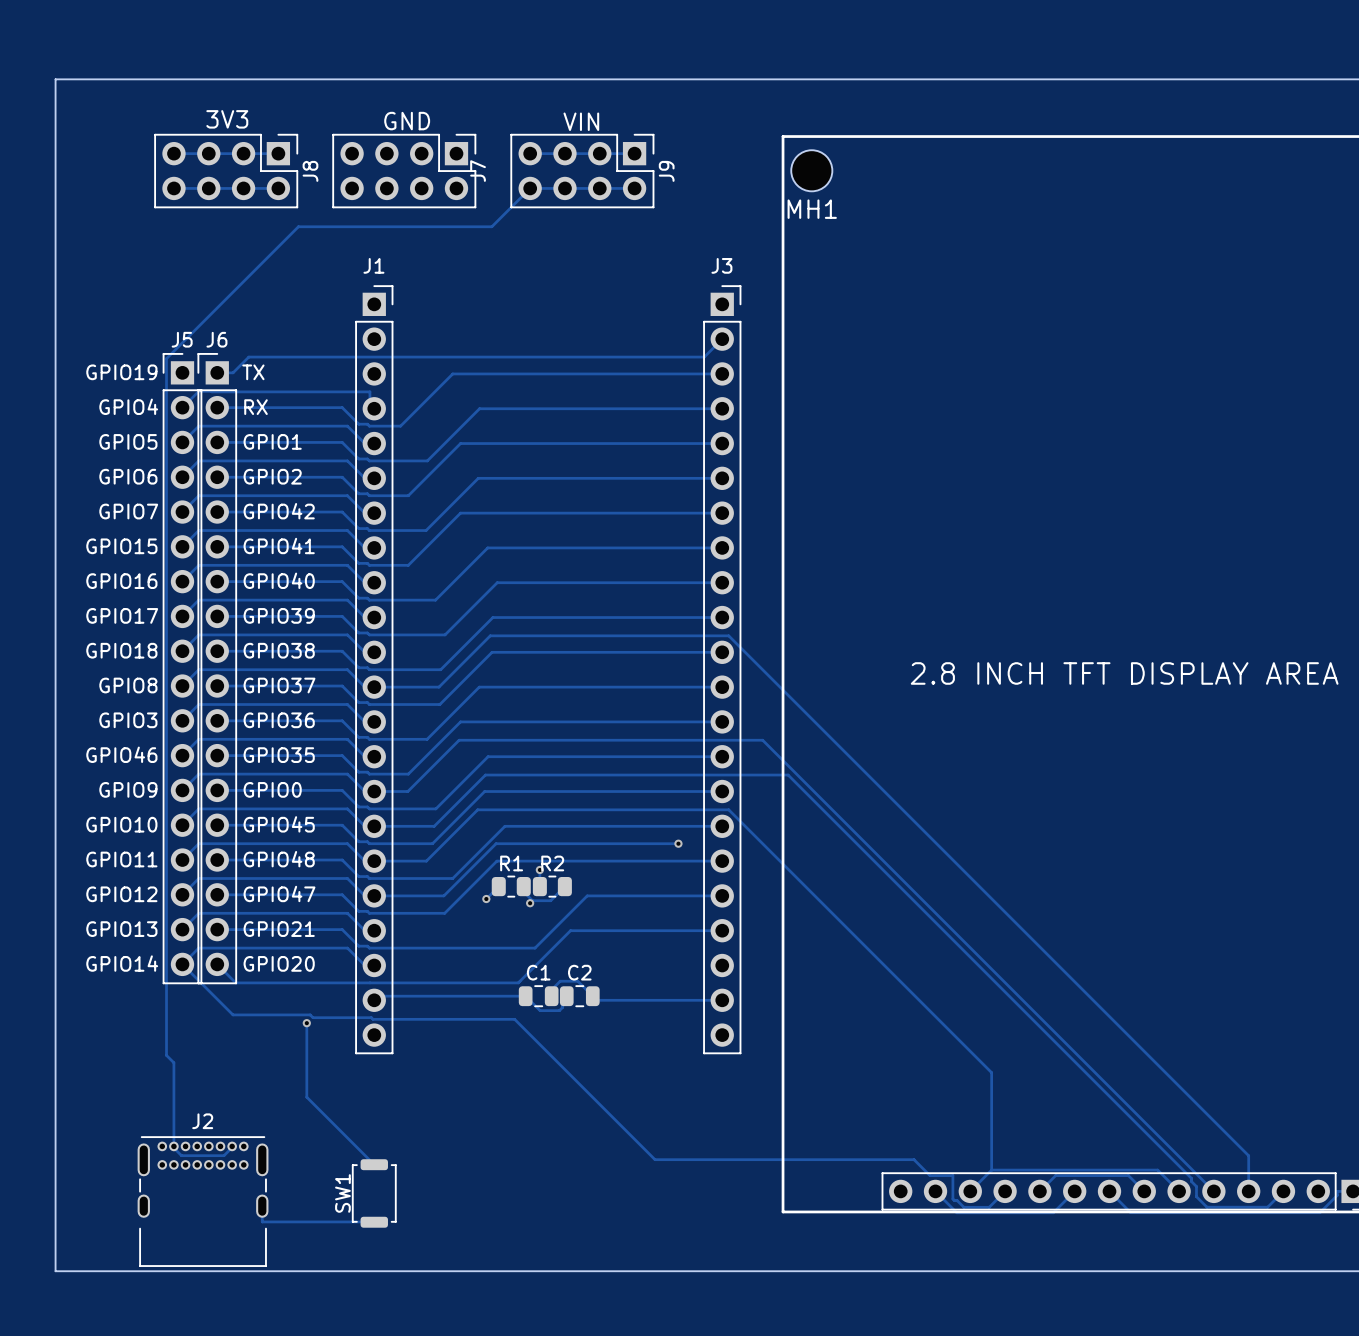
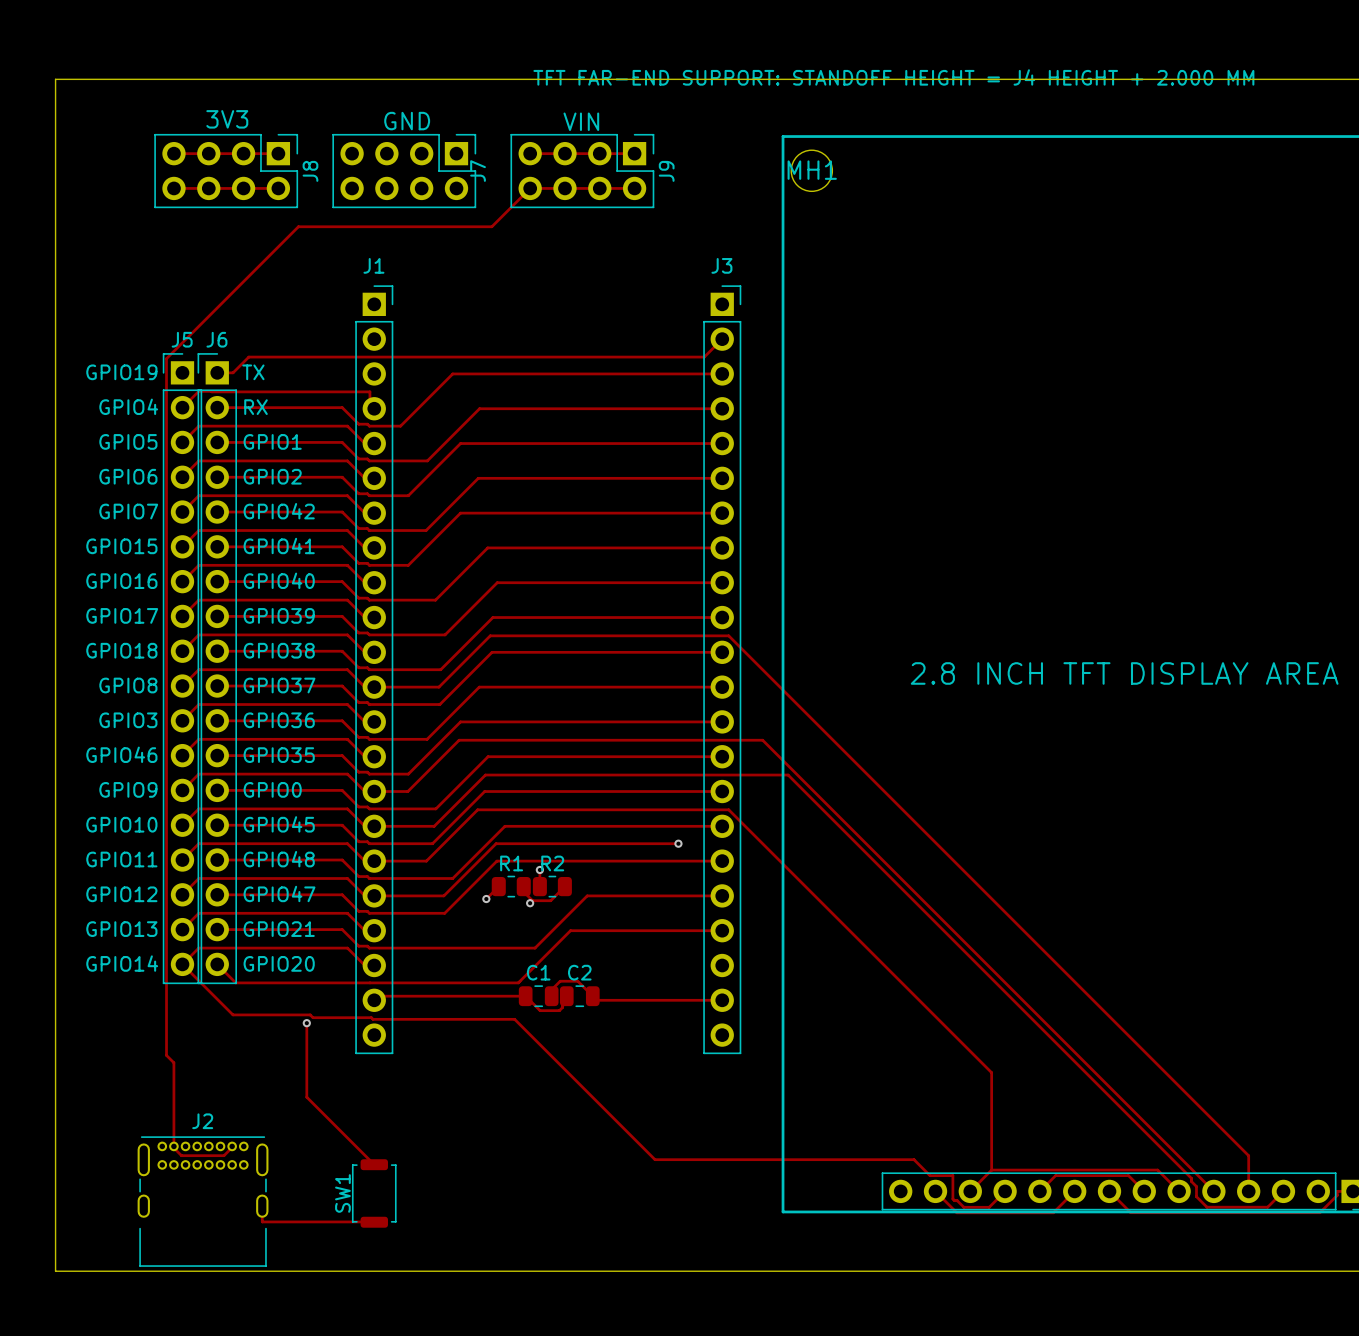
text: none -> TFT FAR-END SUPPORT: STANDOFF HEIGHT = J4 HEIGHT + 2.000 MM (893, 77)
MH1 name position: MH1 (812, 209) -> MH1 (812, 170)

